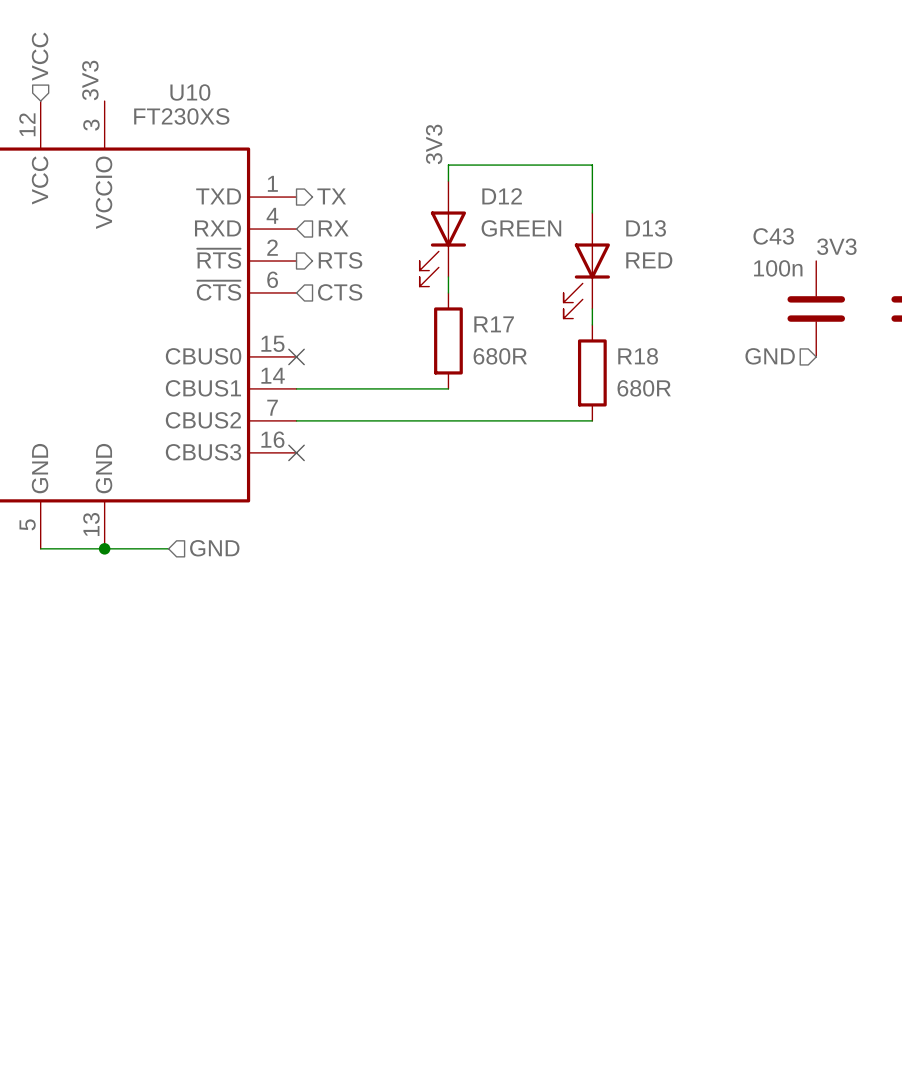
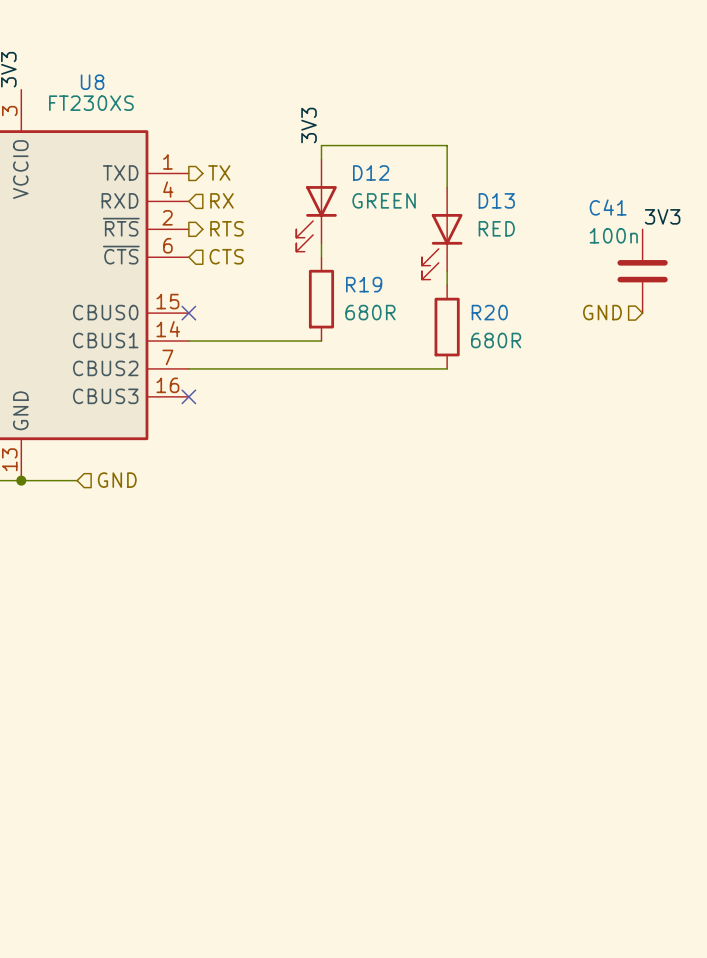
U10 name: U10 (190, 92) -> U8 (92, 82)
C43 name: C43 (773, 236) -> C41 (608, 207)
R17 name: R17 (494, 324) -> R19 (364, 284)
R18 name: R18 (638, 356) -> R20 (489, 312)

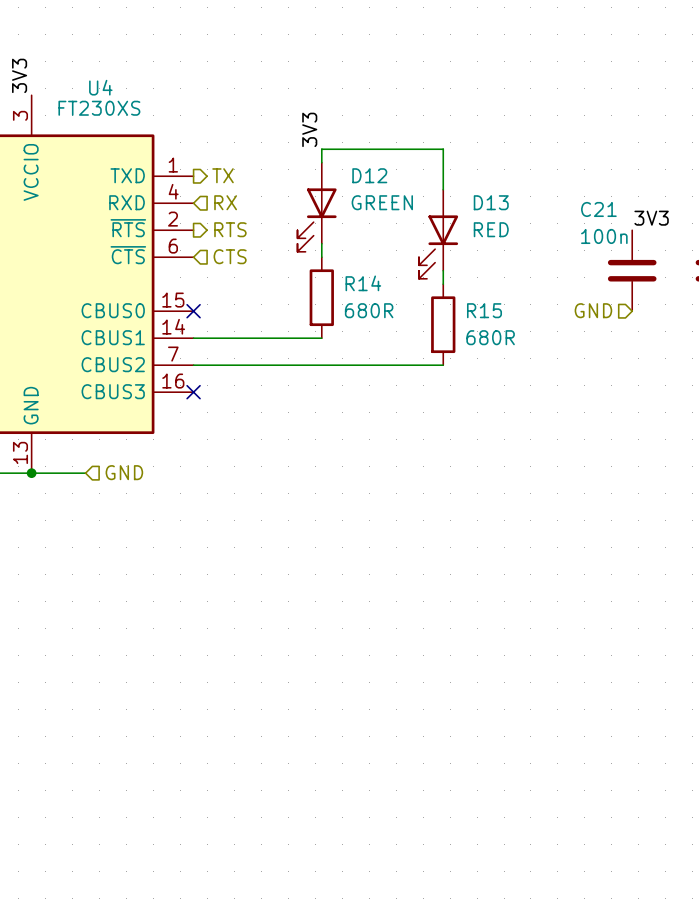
U8 name: U8 (92, 82) -> U4 (100, 87)
C41 name: C41 (608, 207) -> C21 (598, 209)
R19 name: R19 (364, 284) -> R14 (363, 283)
R20 name: R20 (489, 312) -> R15 (484, 310)

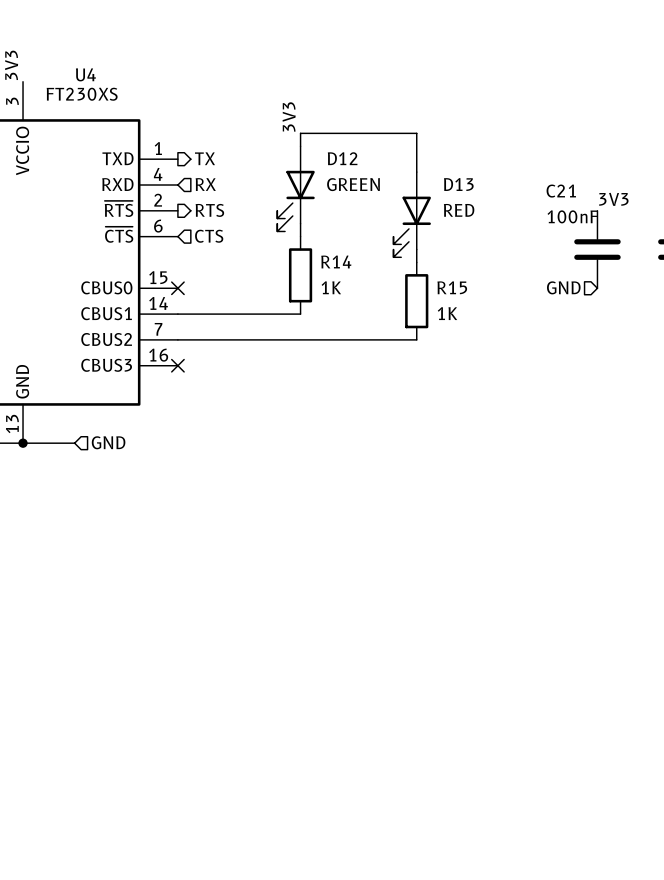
C21 value: 100n (604, 236) -> 100nF (572, 216)
R14 value: 680R (369, 310) -> 1K (331, 287)
R15 value: 680R (490, 337) -> 1K (447, 313)

